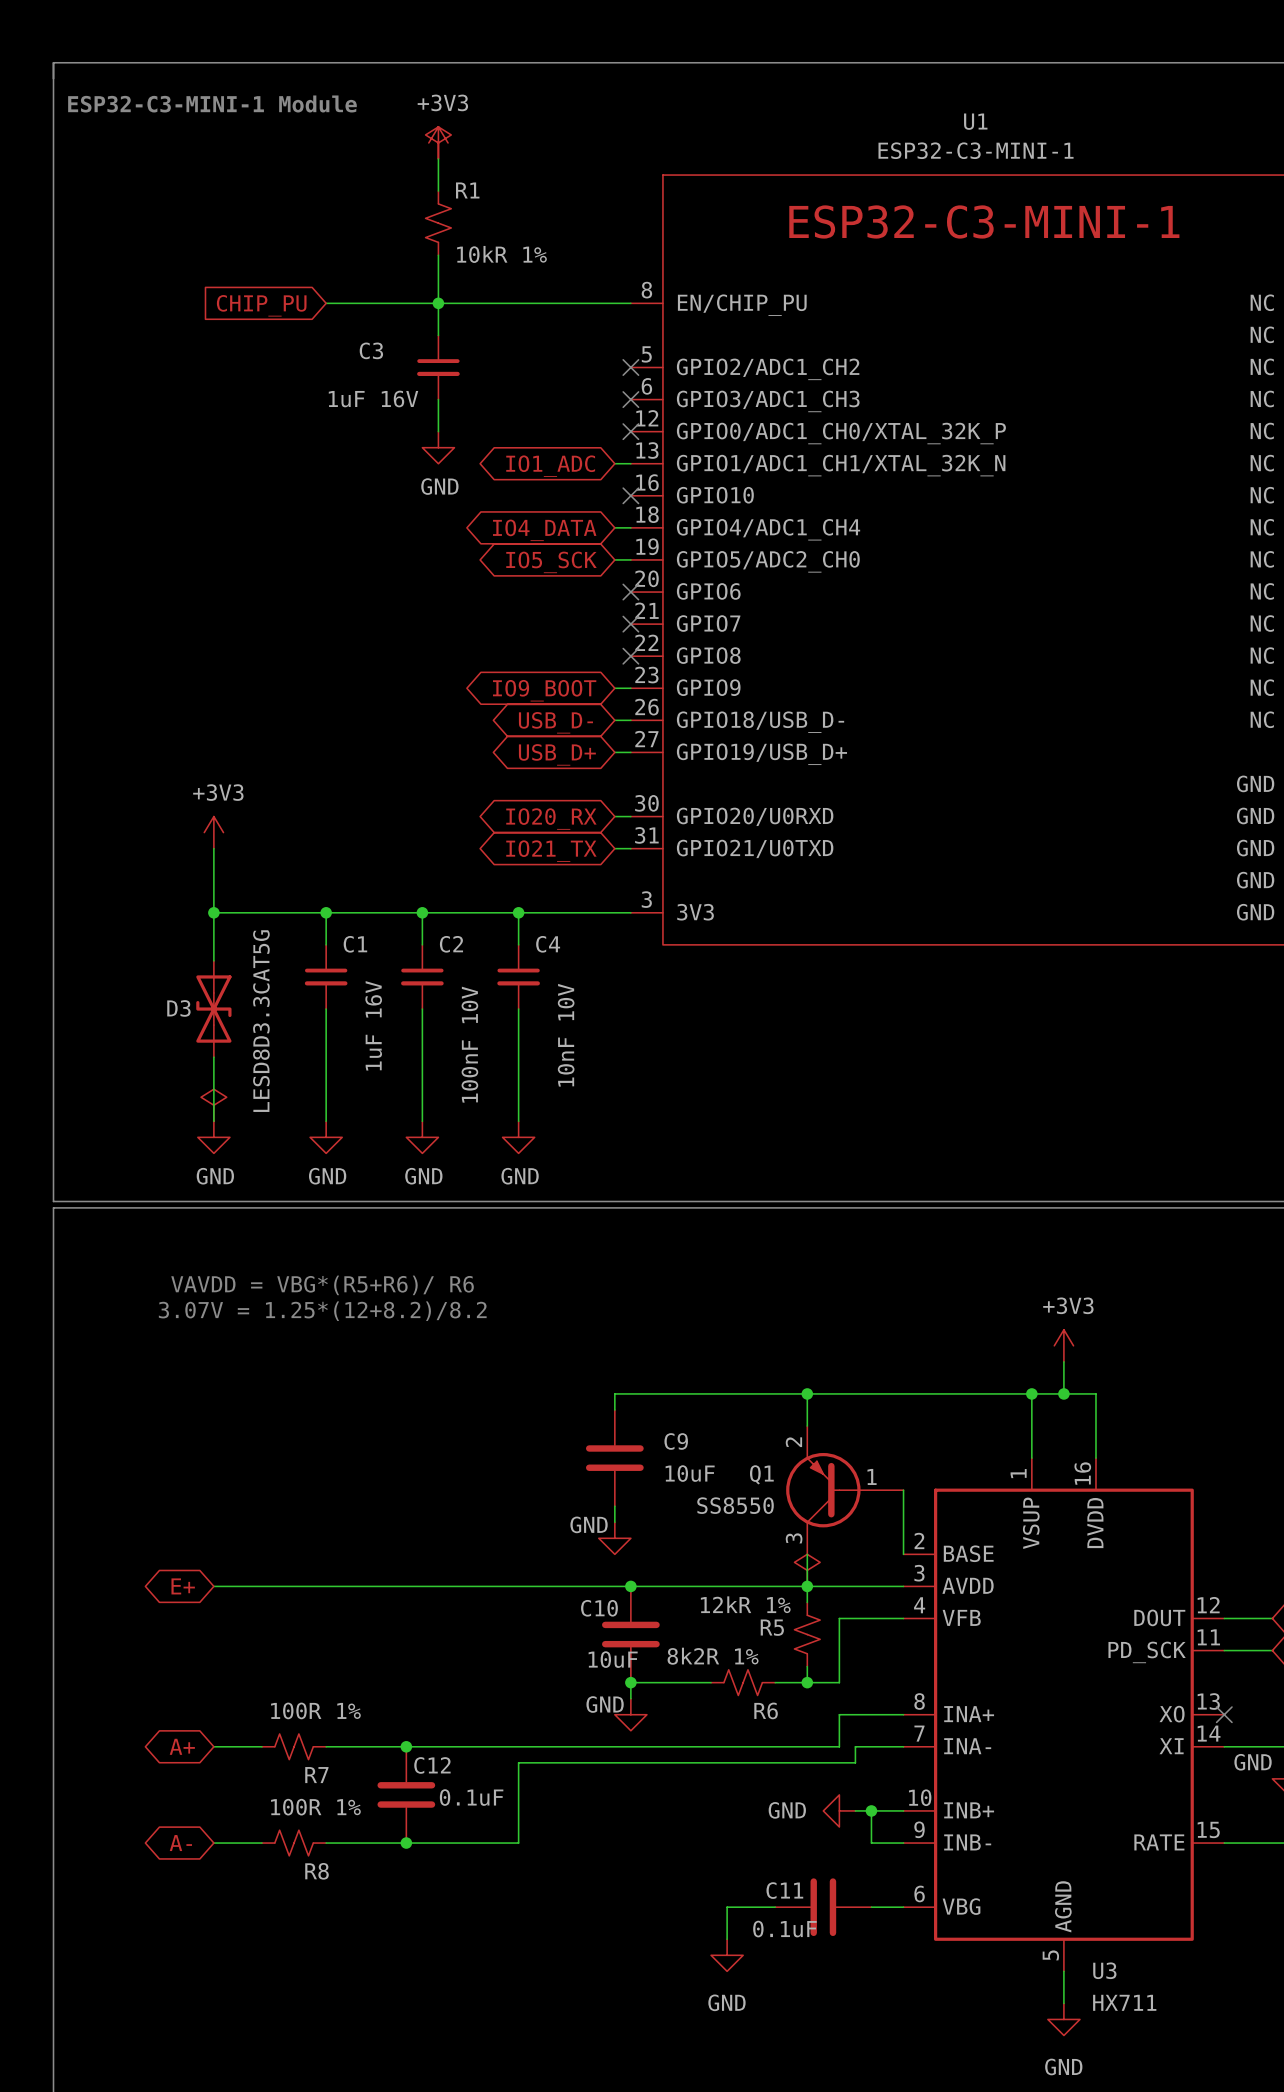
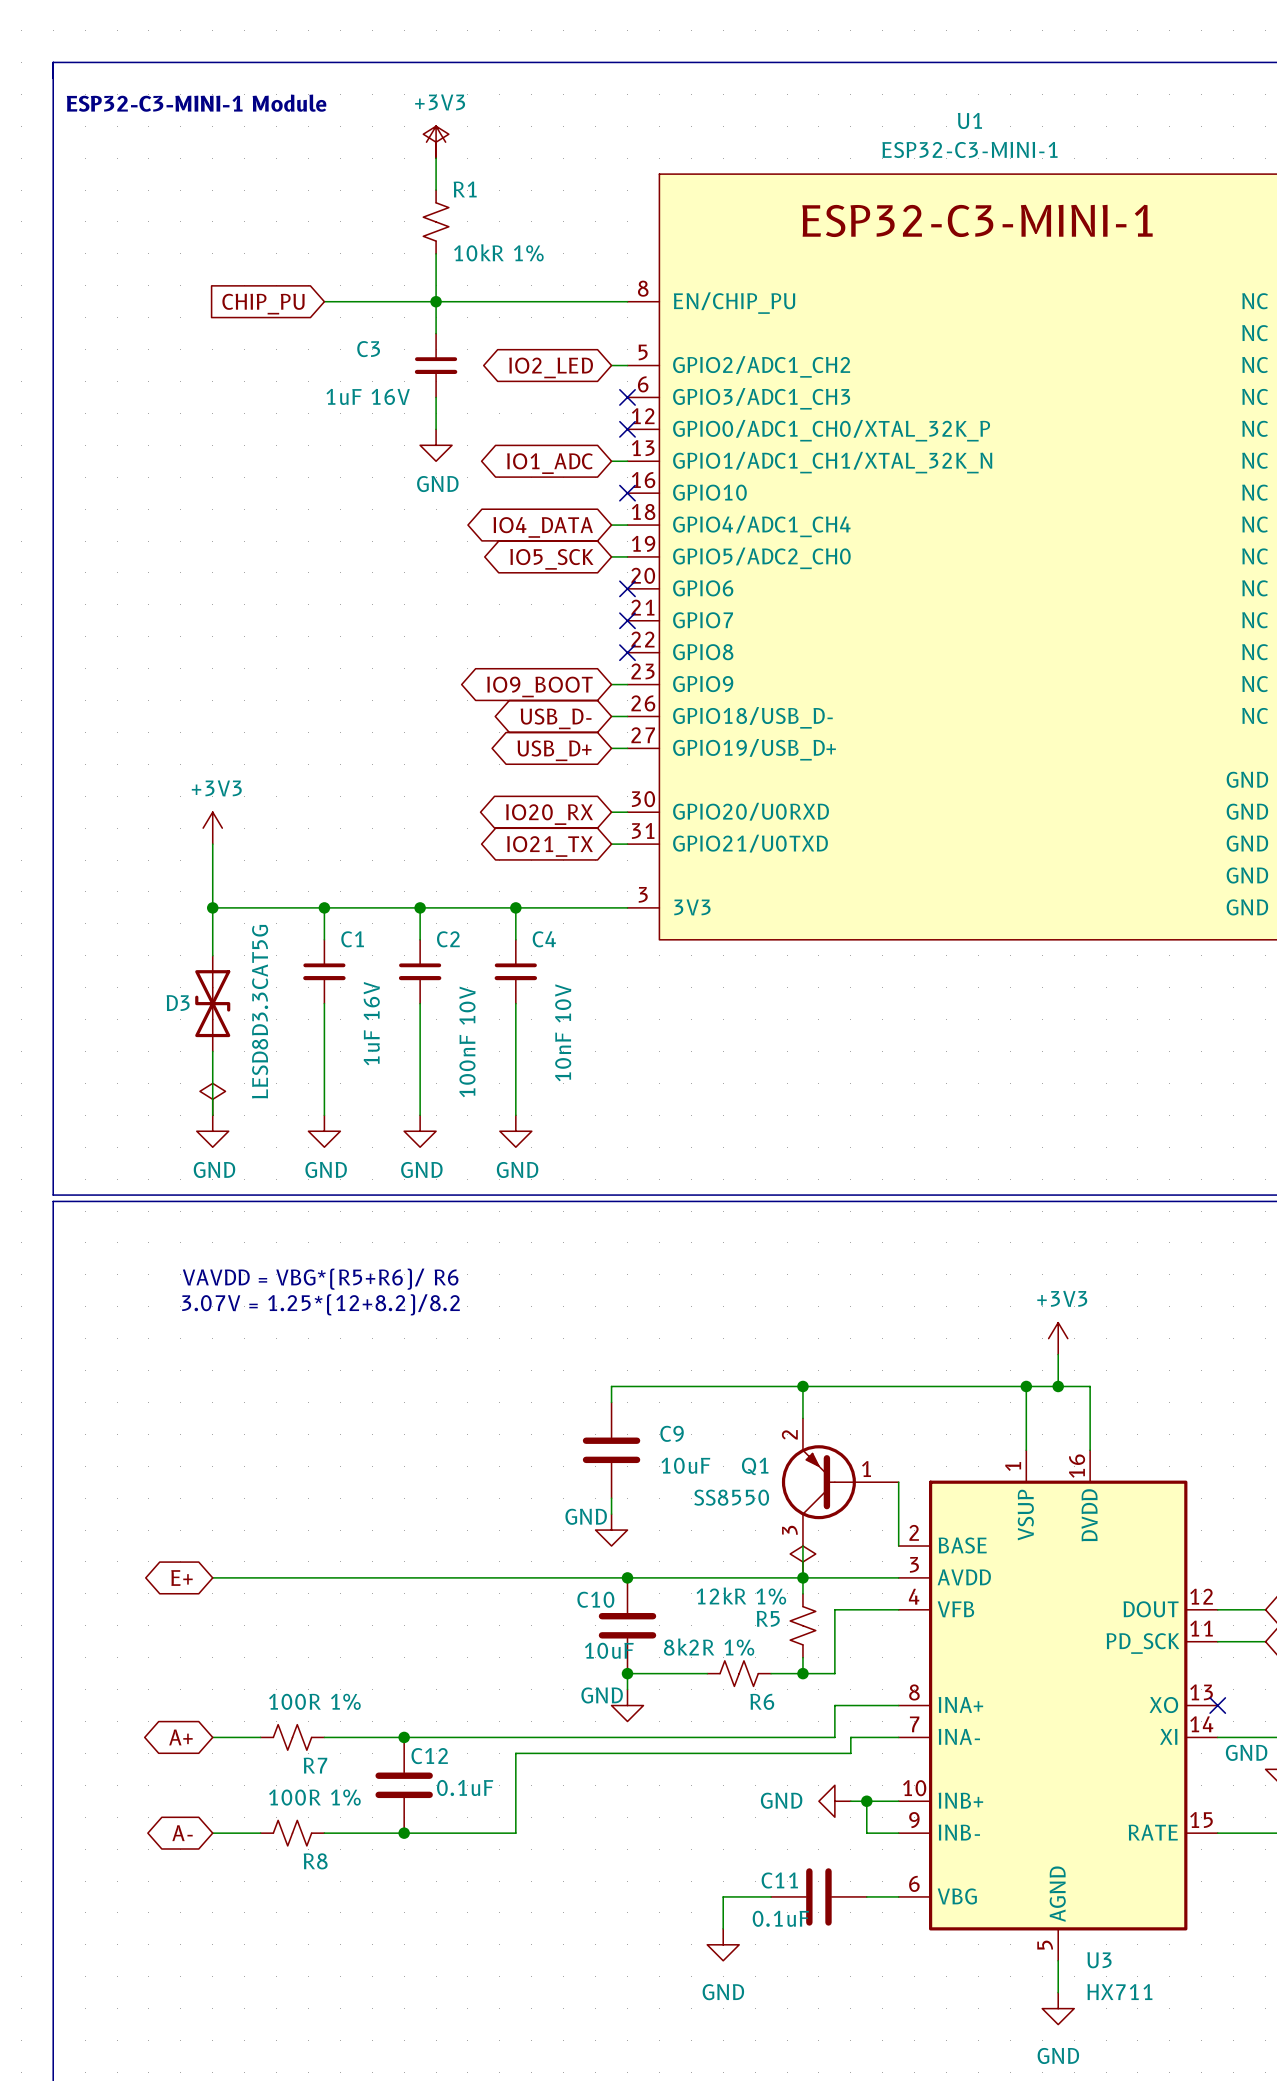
wire: none -> (611, 365) (627, 365)
no-connect mark: (630, 367) -> none
global label: none -> IO2_LED (551, 367)

